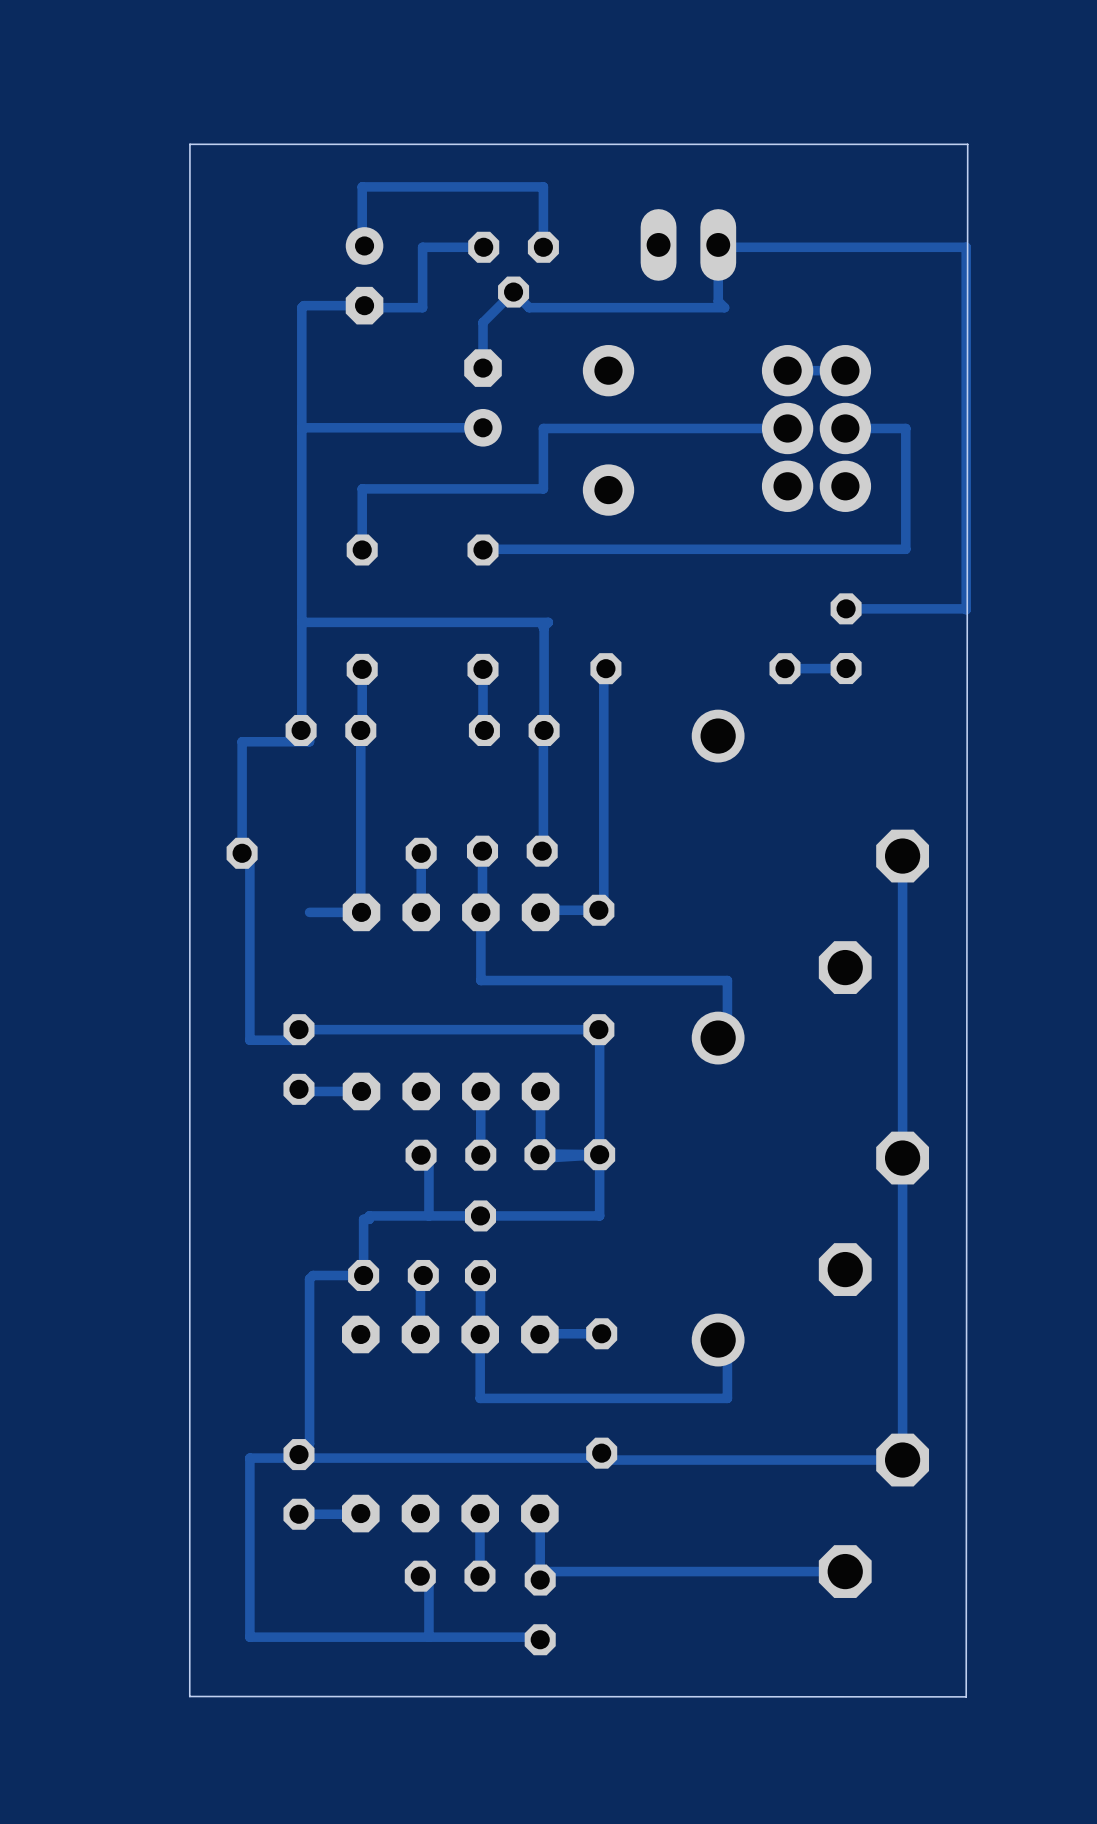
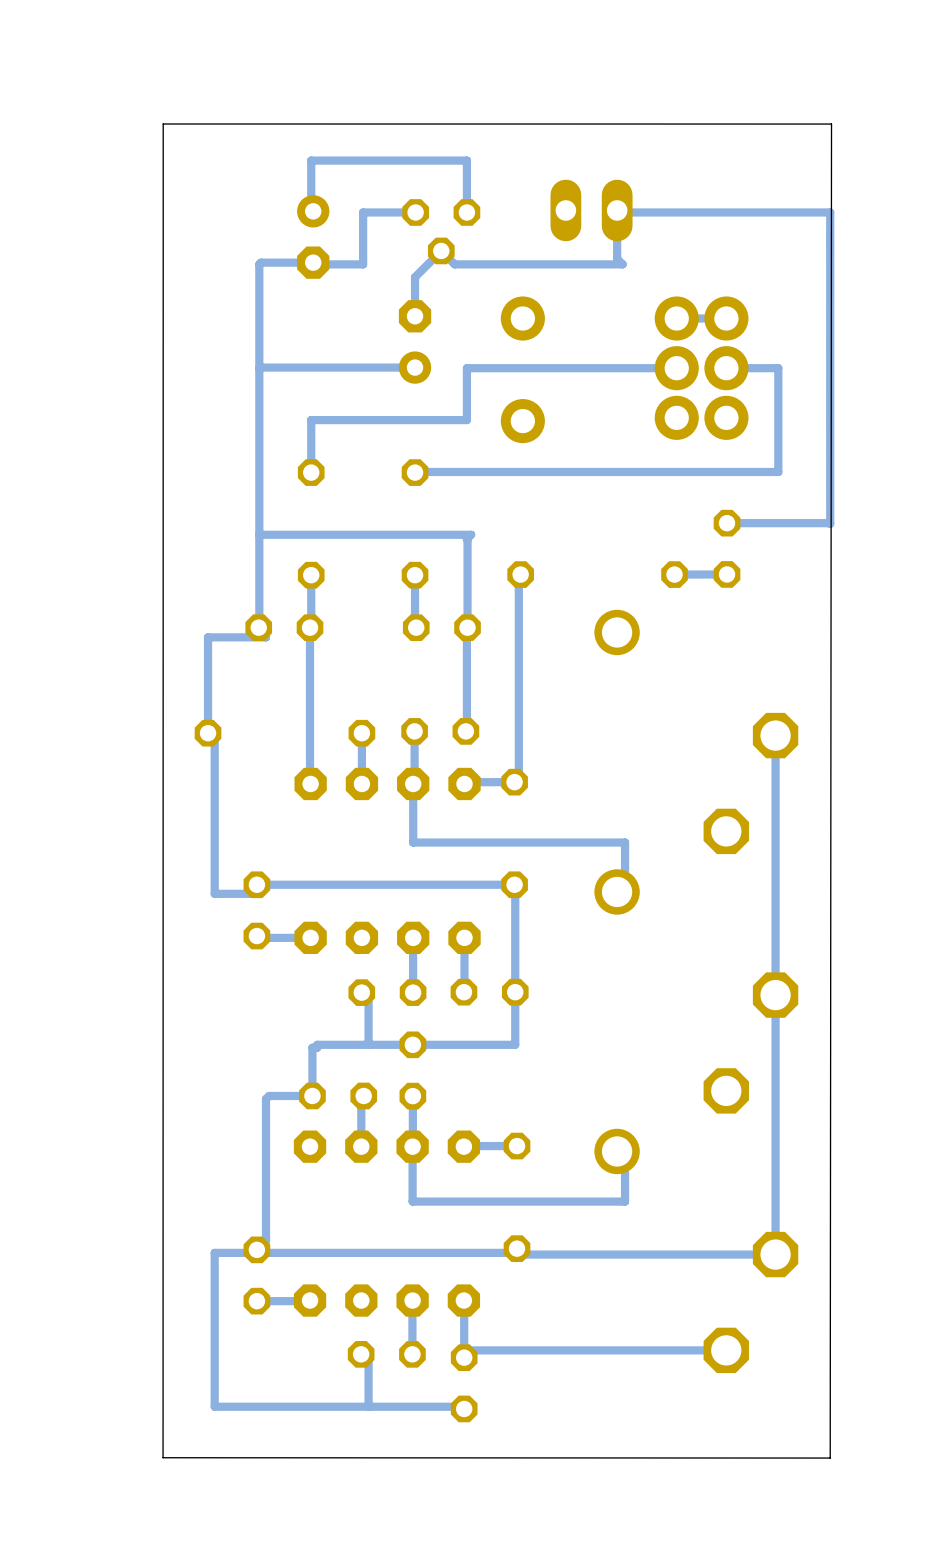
track: (361, 912) (309, 912) -> none
track: (539, 1153) (599, 1154) (543, 1158) -> none

